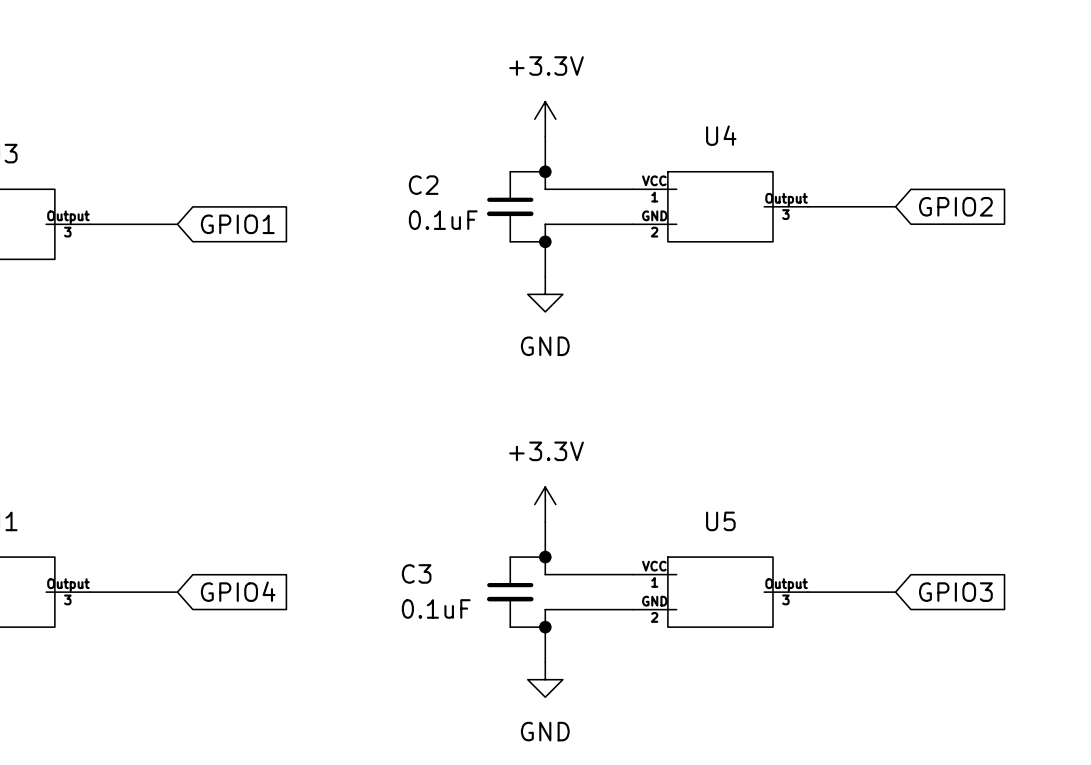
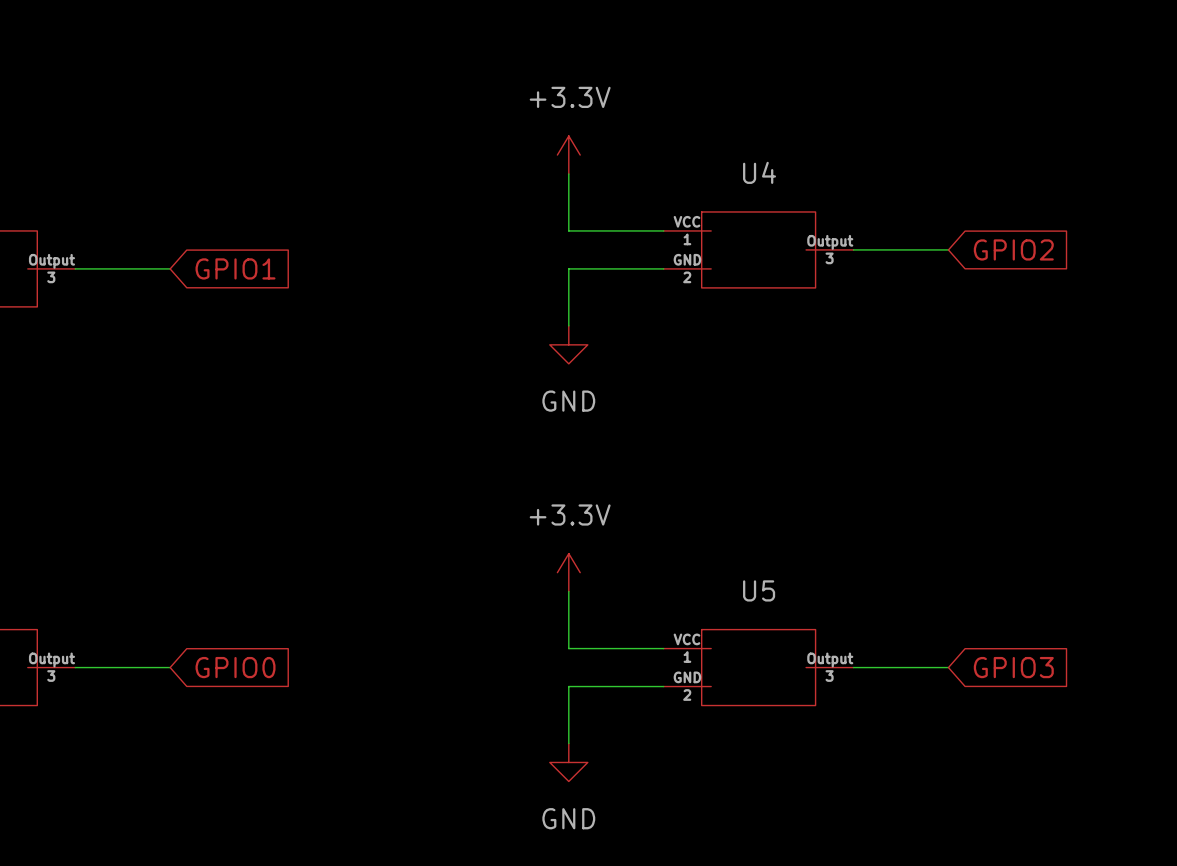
wire: (510, 171) (545, 171) -> none
junction: (545, 171) -> none
C2: 0.1uF (510, 206) -> none
wire: (510, 241) (545, 241) -> none
junction: (545, 241) -> none
wire: (510, 557) (545, 557) -> none
junction: (545, 557) -> none
global label: GPIO4 (238, 591) -> GPIO0 (235, 667)
C3: 0.1uF (510, 592) -> none
wire: (510, 627) (545, 627) -> none
junction: (545, 627) -> none

